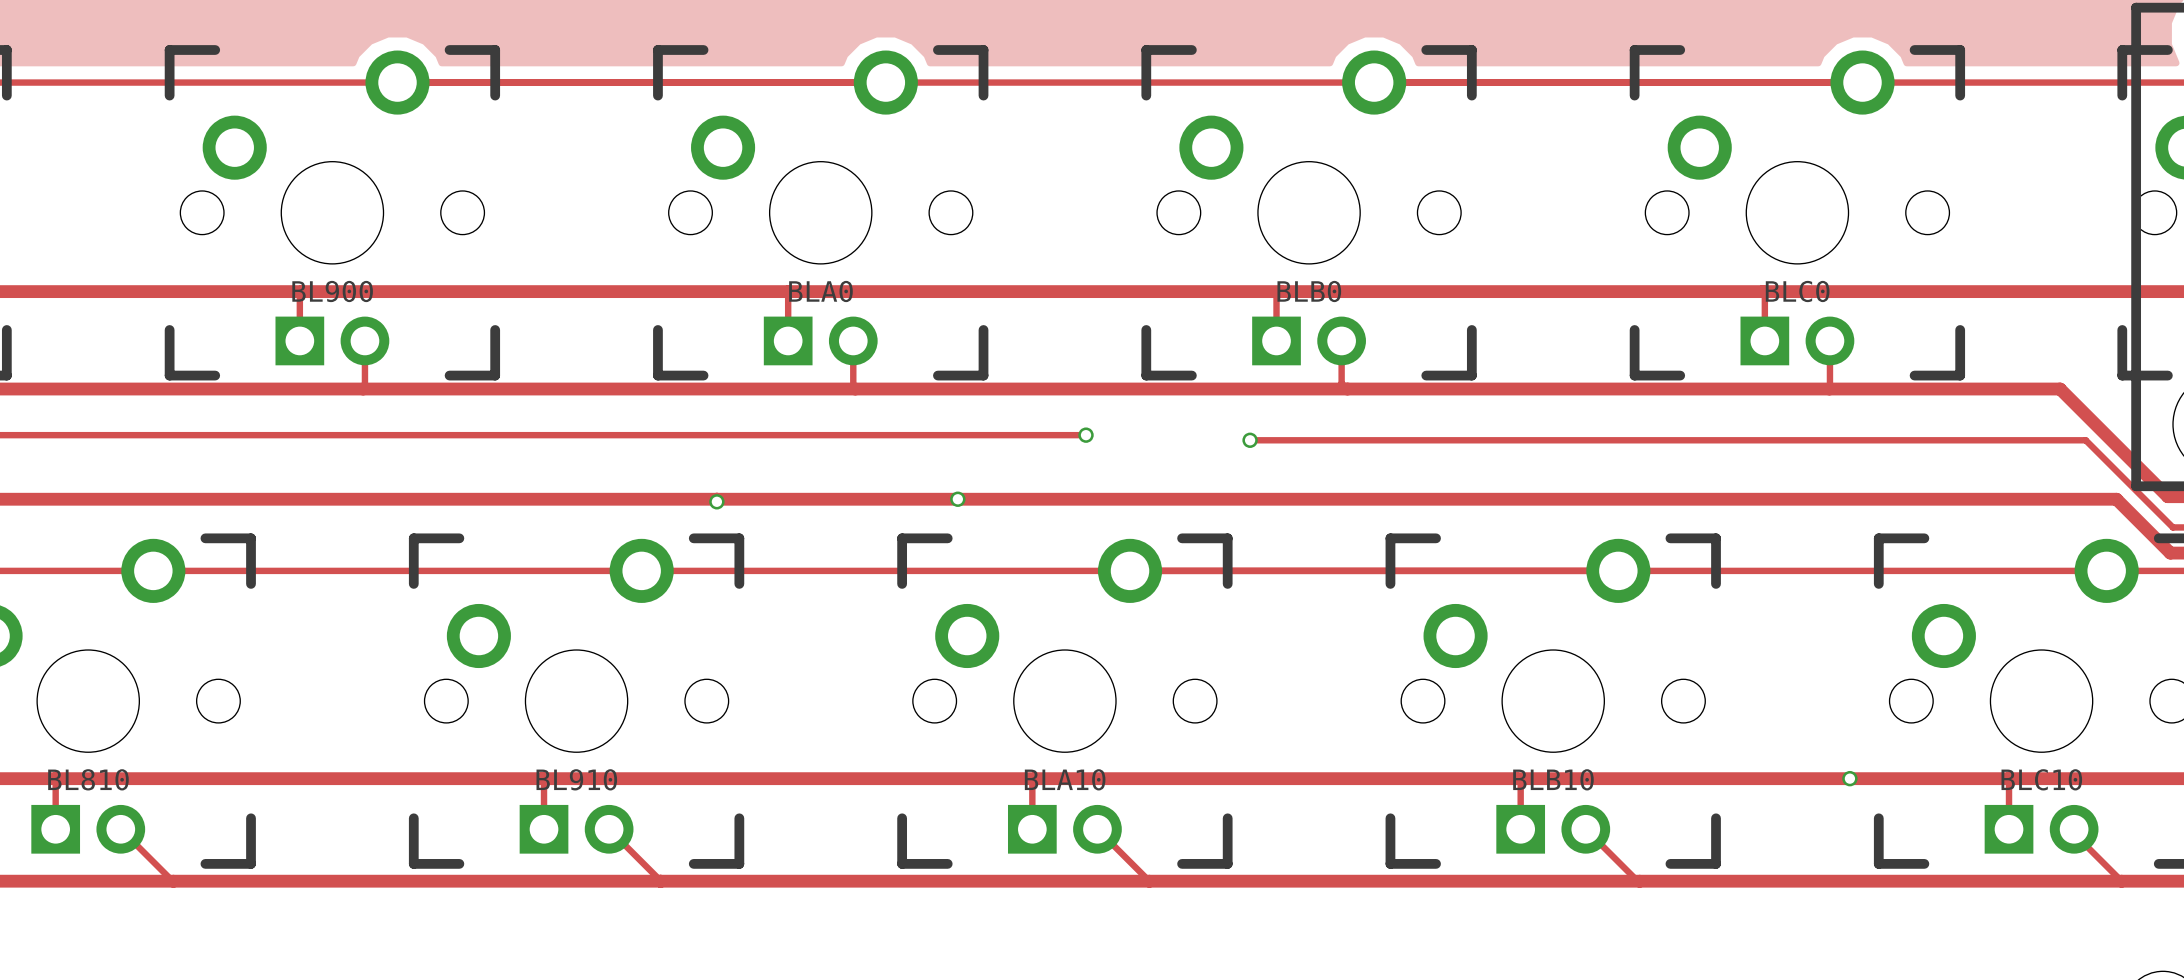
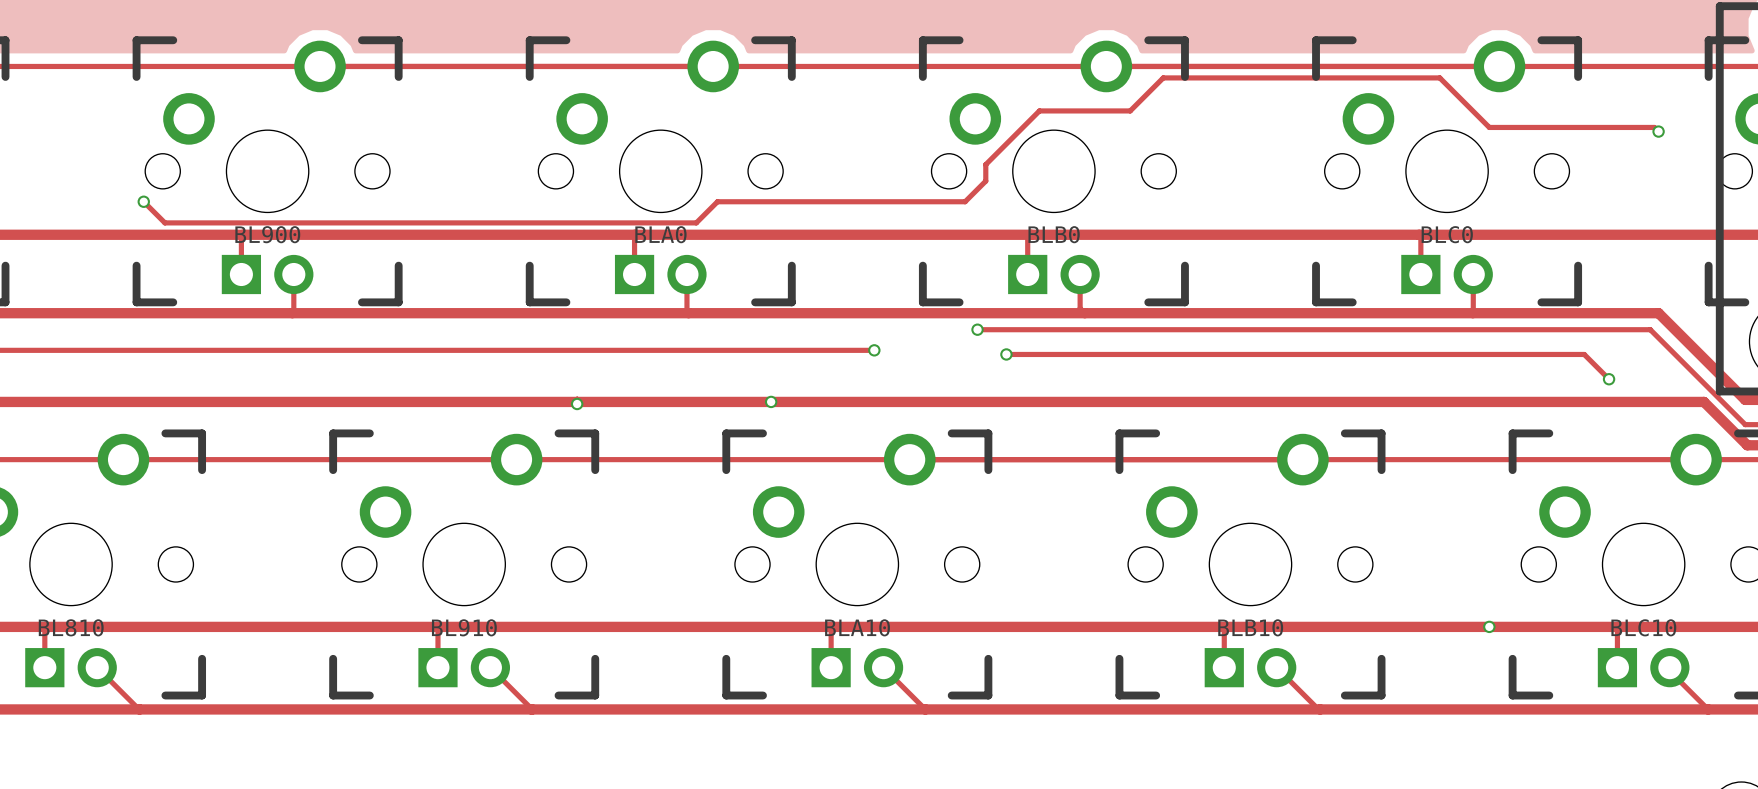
track: none -> (1658, 131) (1654, 127) (1489, 127) (1439, 77) (1163, 77) (1130, 110) (1039, 110) (985, 164) (985, 181) (965, 201) (717, 201) (696, 222) (164, 222) (143, 201)
via: none -> (1658, 131)
via: none -> (143, 201)
track: none -> (977, 329) (1650, 329) (1745, 424) (1749, 424)
via: none -> (977, 329)
track: (1967, 440) (2085, 440) (2172, 527) -> (1584, 354) (1609, 379)
via: none -> (1609, 379)

